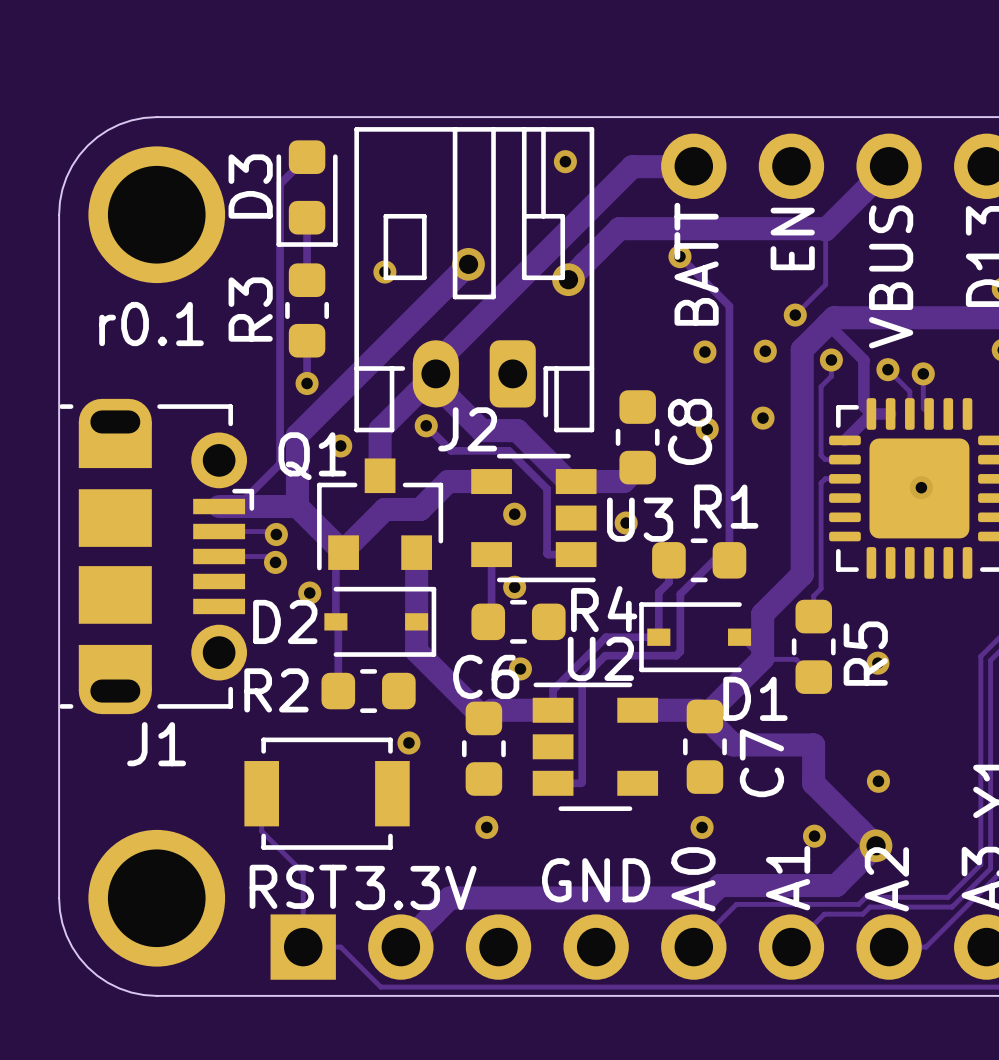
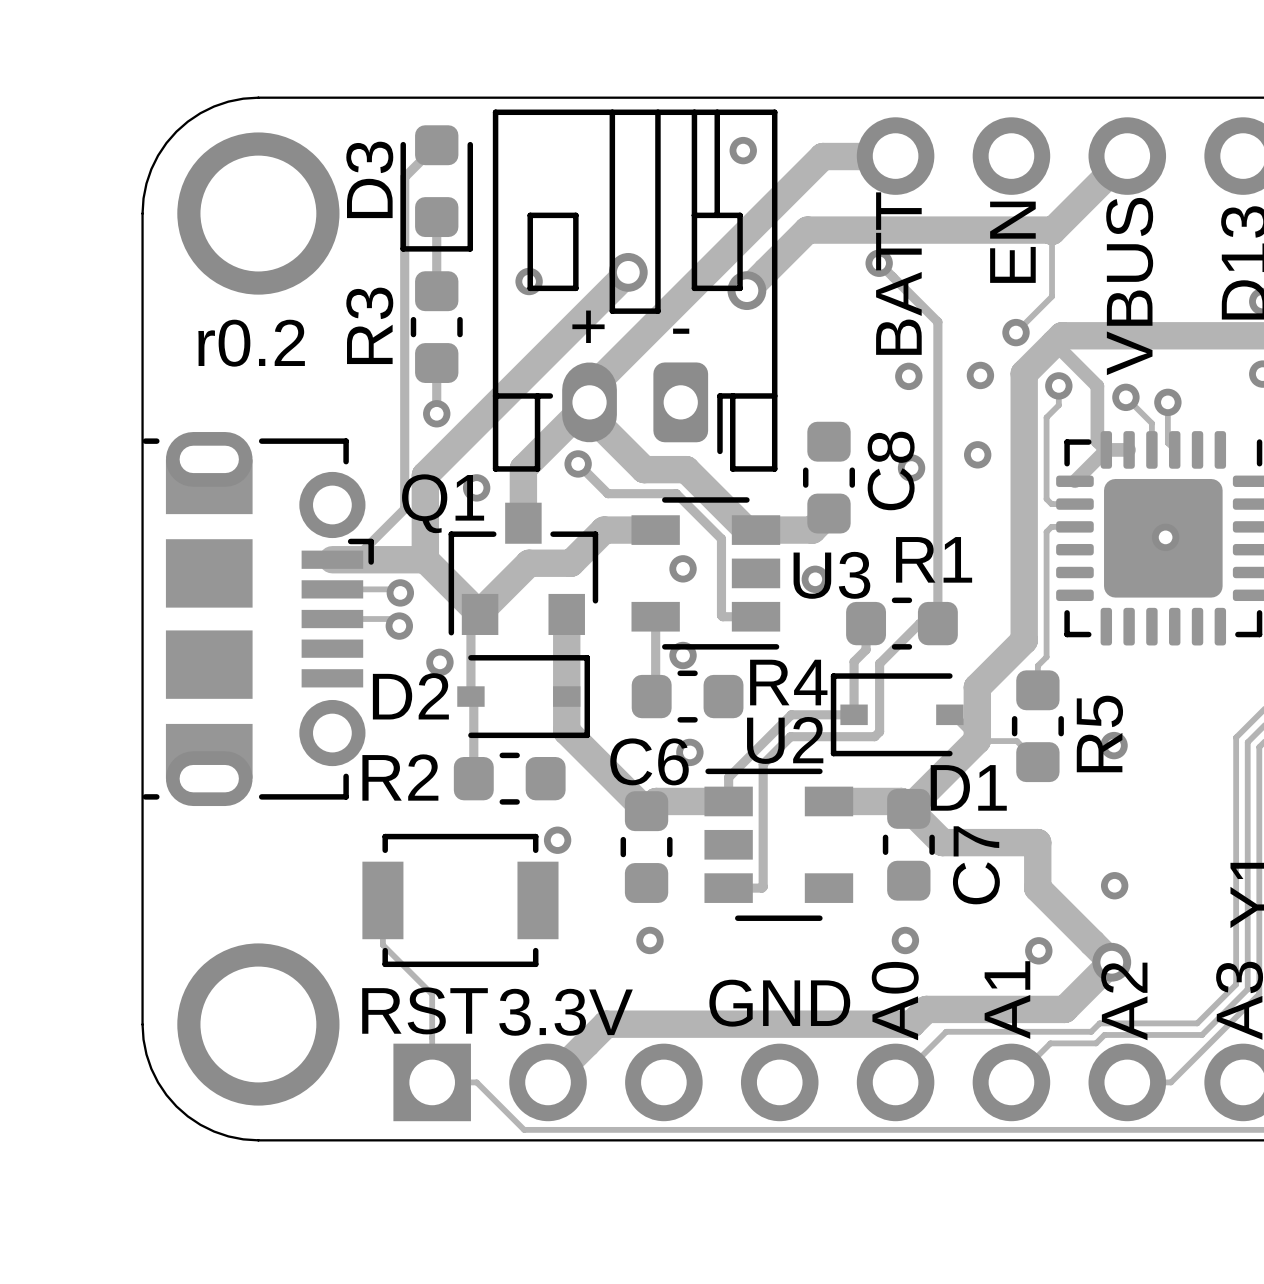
text: none -> + (588, 326)
text: none -> - (681, 331)
text: r0.1 (151, 324) -> r0.2 (251, 343)
J2 name: J2 (467, 429) -> none
J1 name: J1 (156, 744) -> none

